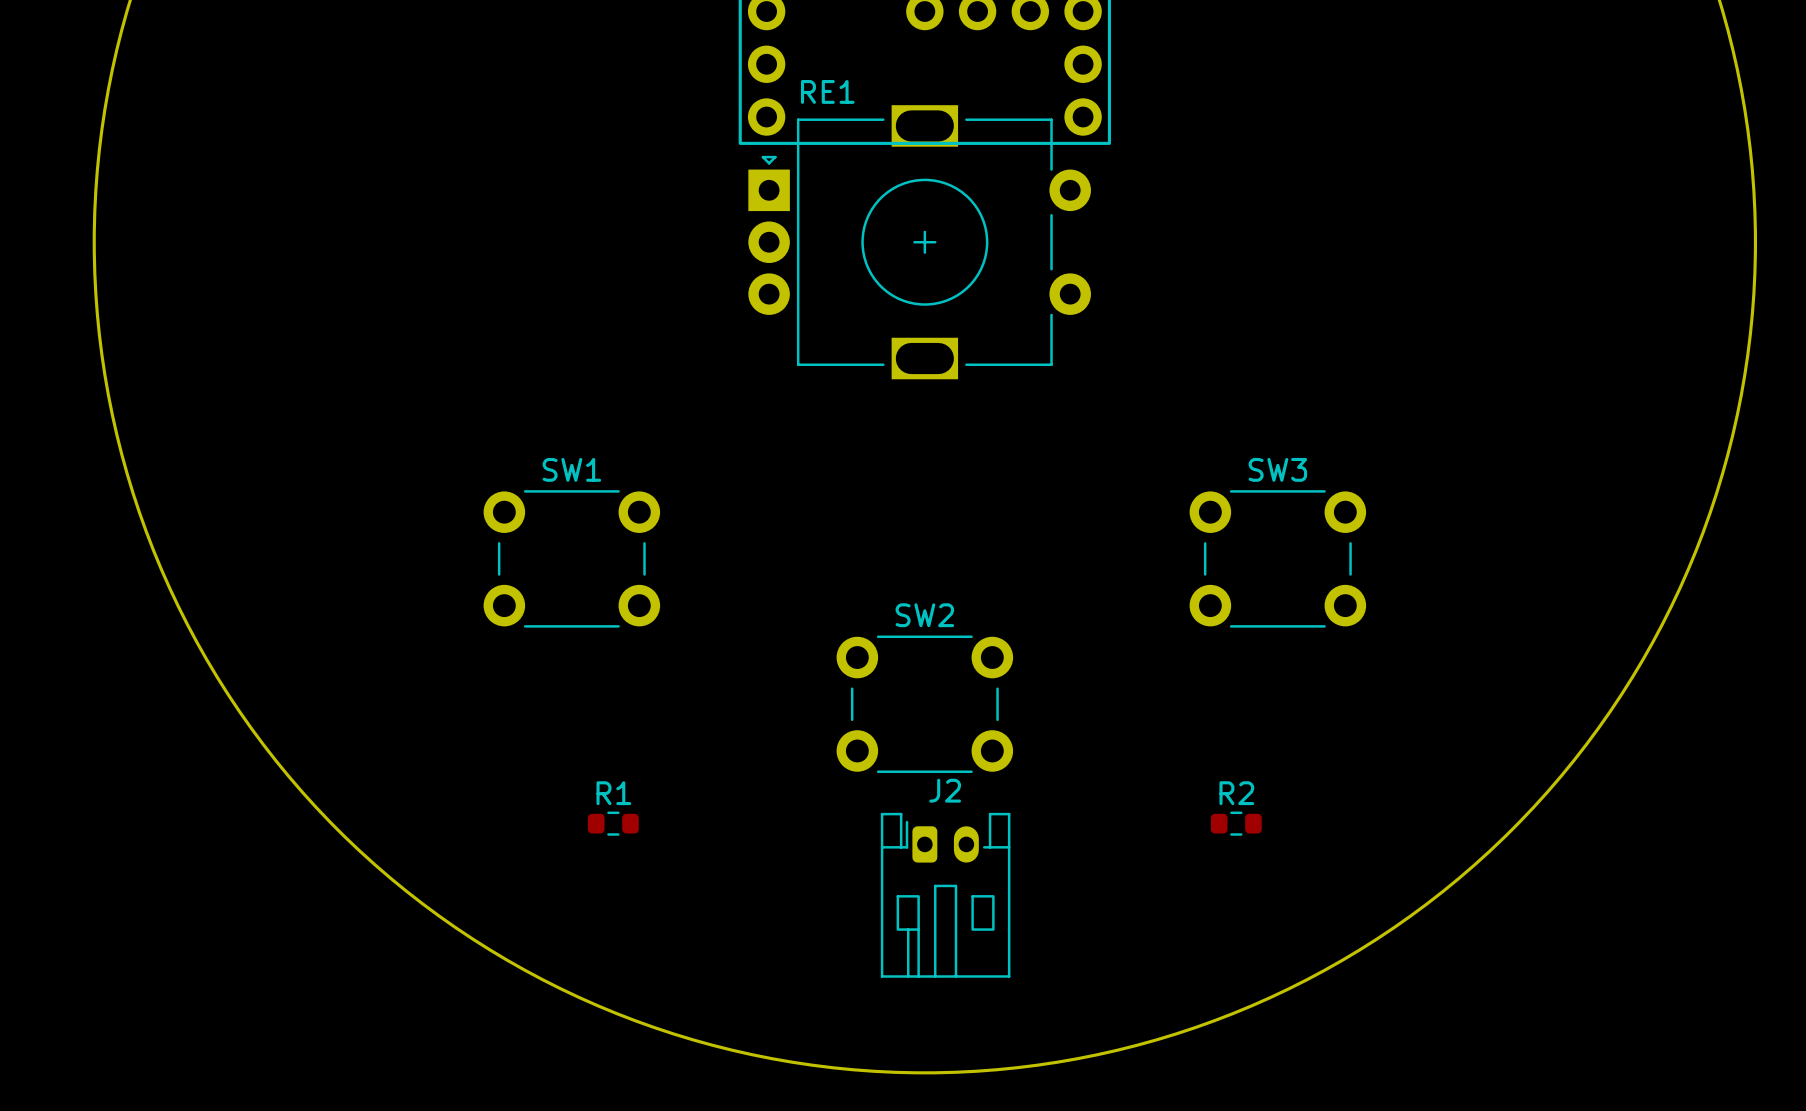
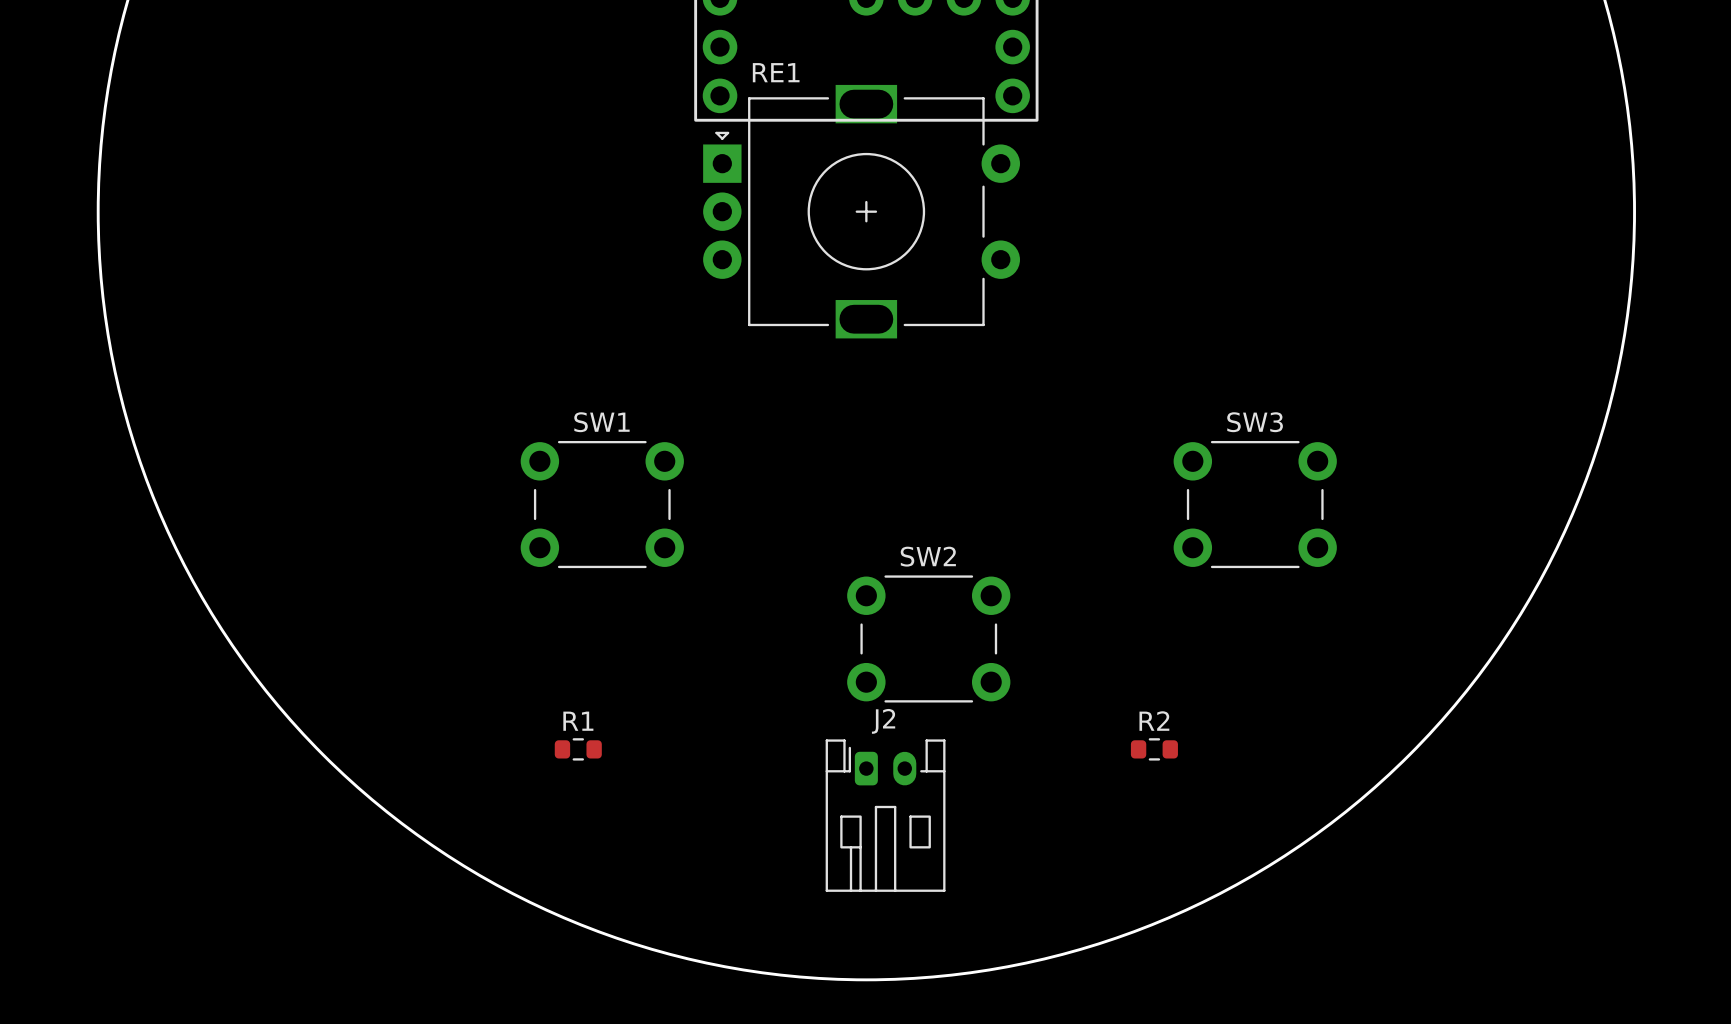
SW1 position: (571, 558) -> (602, 504)
SW3 position: (1277, 558) -> (1255, 504)
SW2 position: (924, 704) -> (928, 638)

